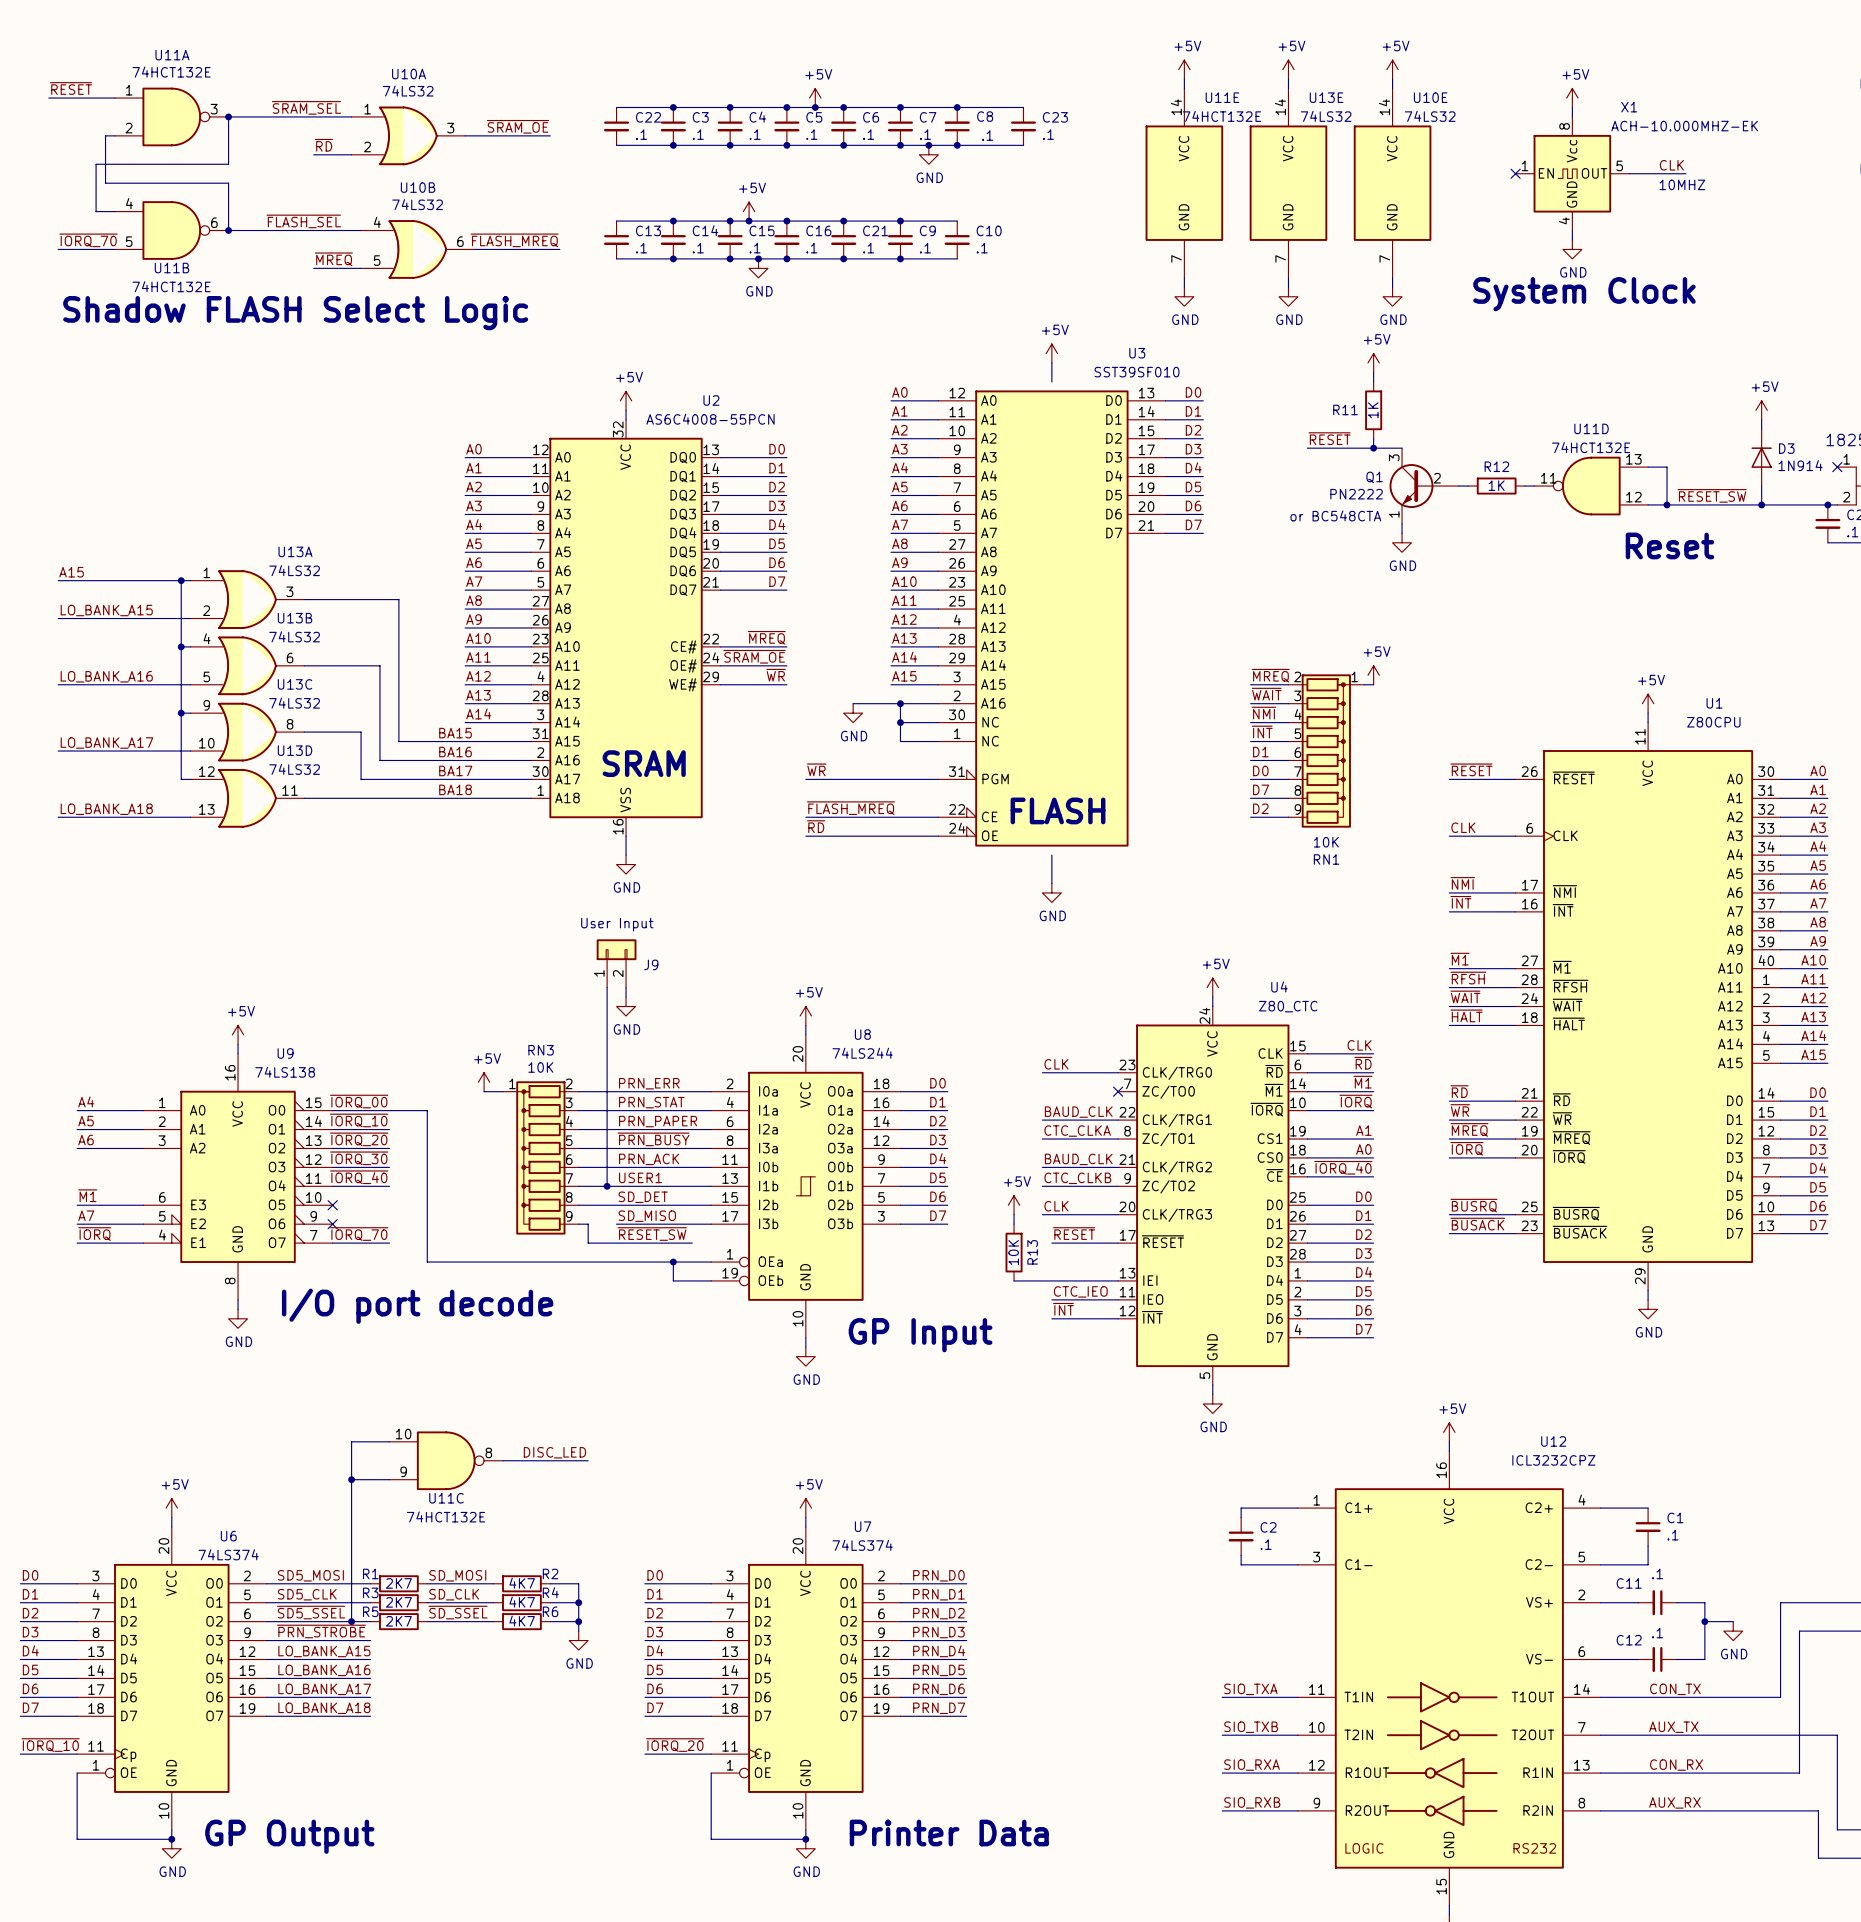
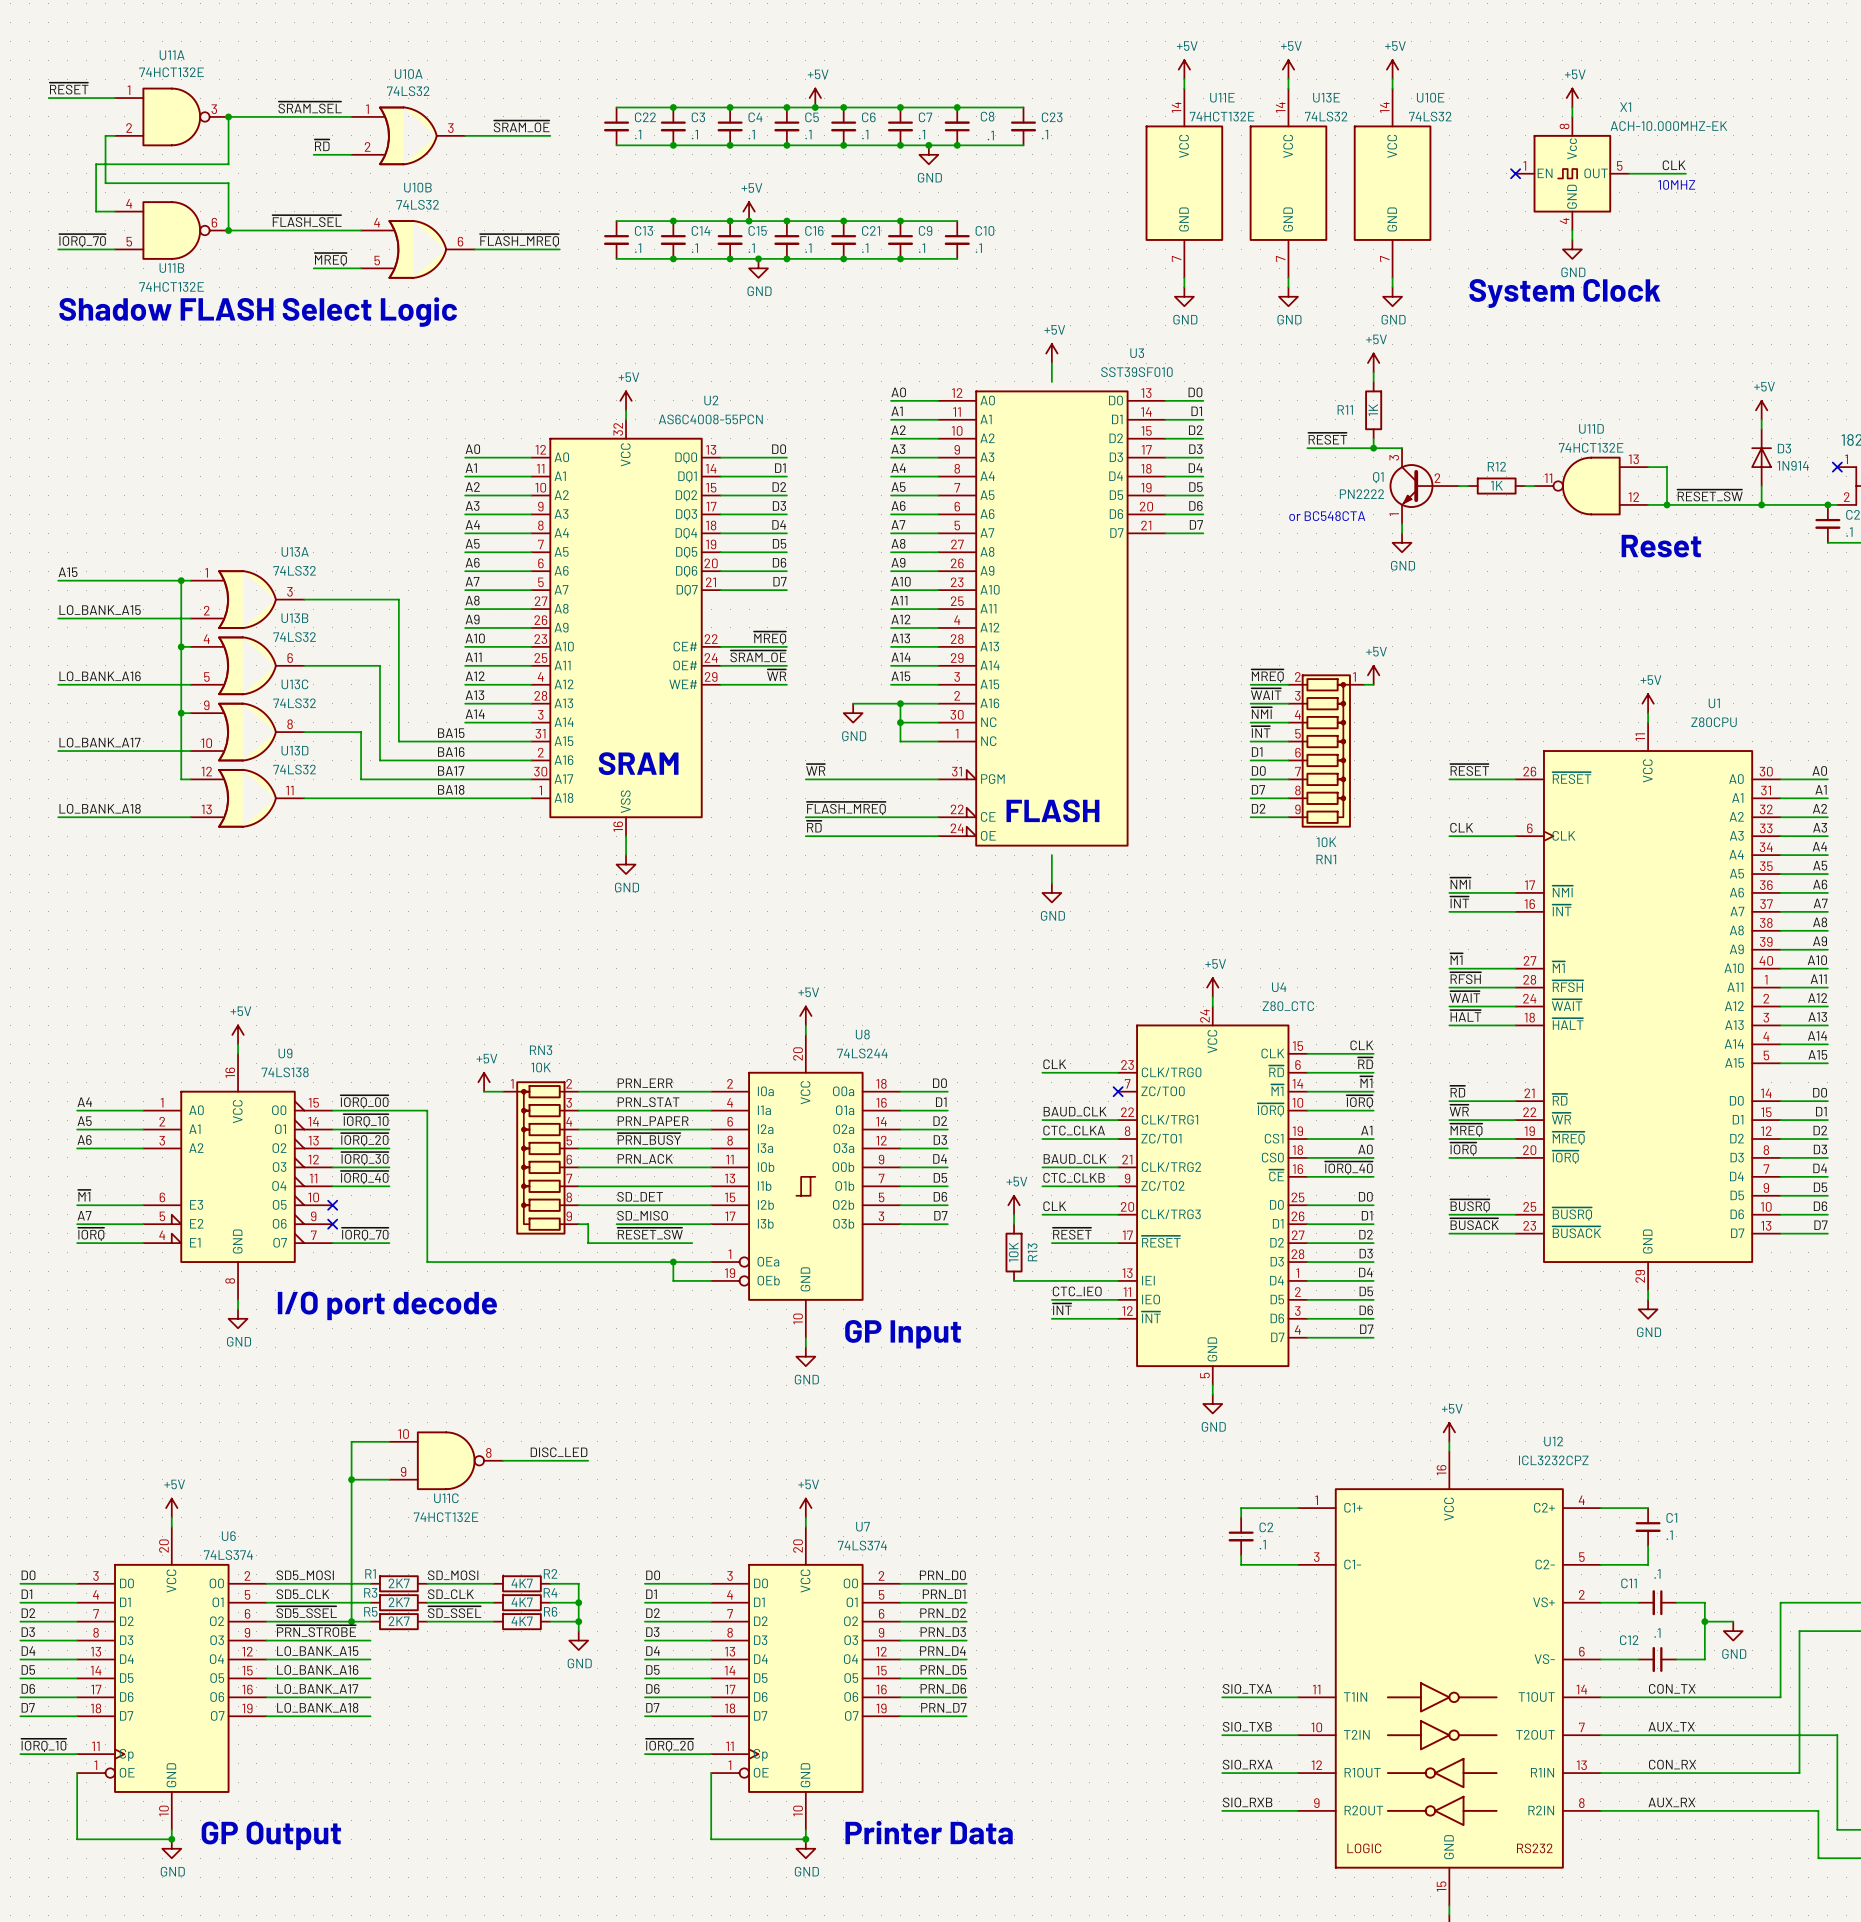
text: User Input (617, 924) -> none
J9: (616, 963) -> none
wire: (607, 987) (607, 1186) -> none
wire: (626, 987) (626, 997) -> none
power symbol: GND (626, 1006) -> none
label: USER1 (640, 1177) -> none
junction: (607, 1186) -> none

